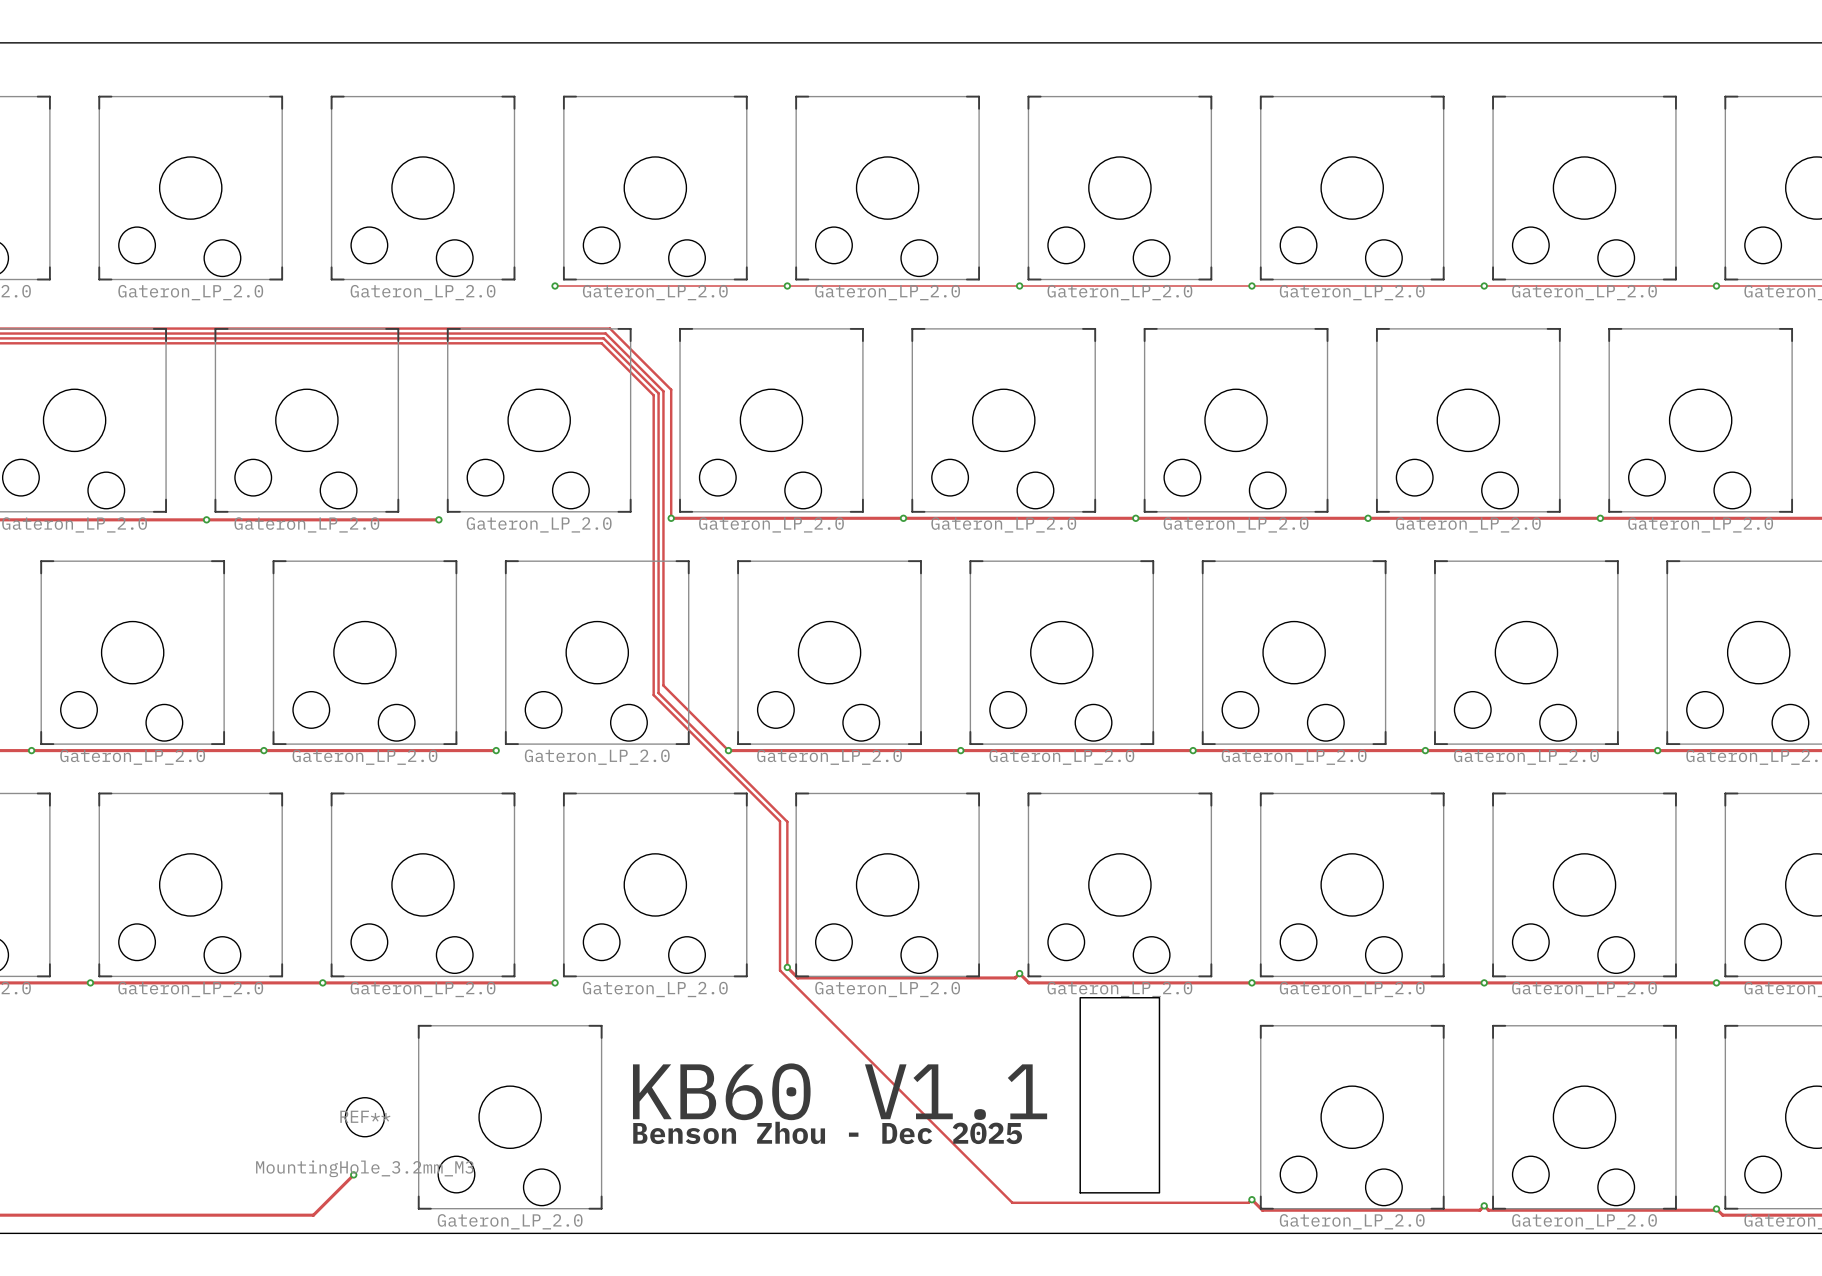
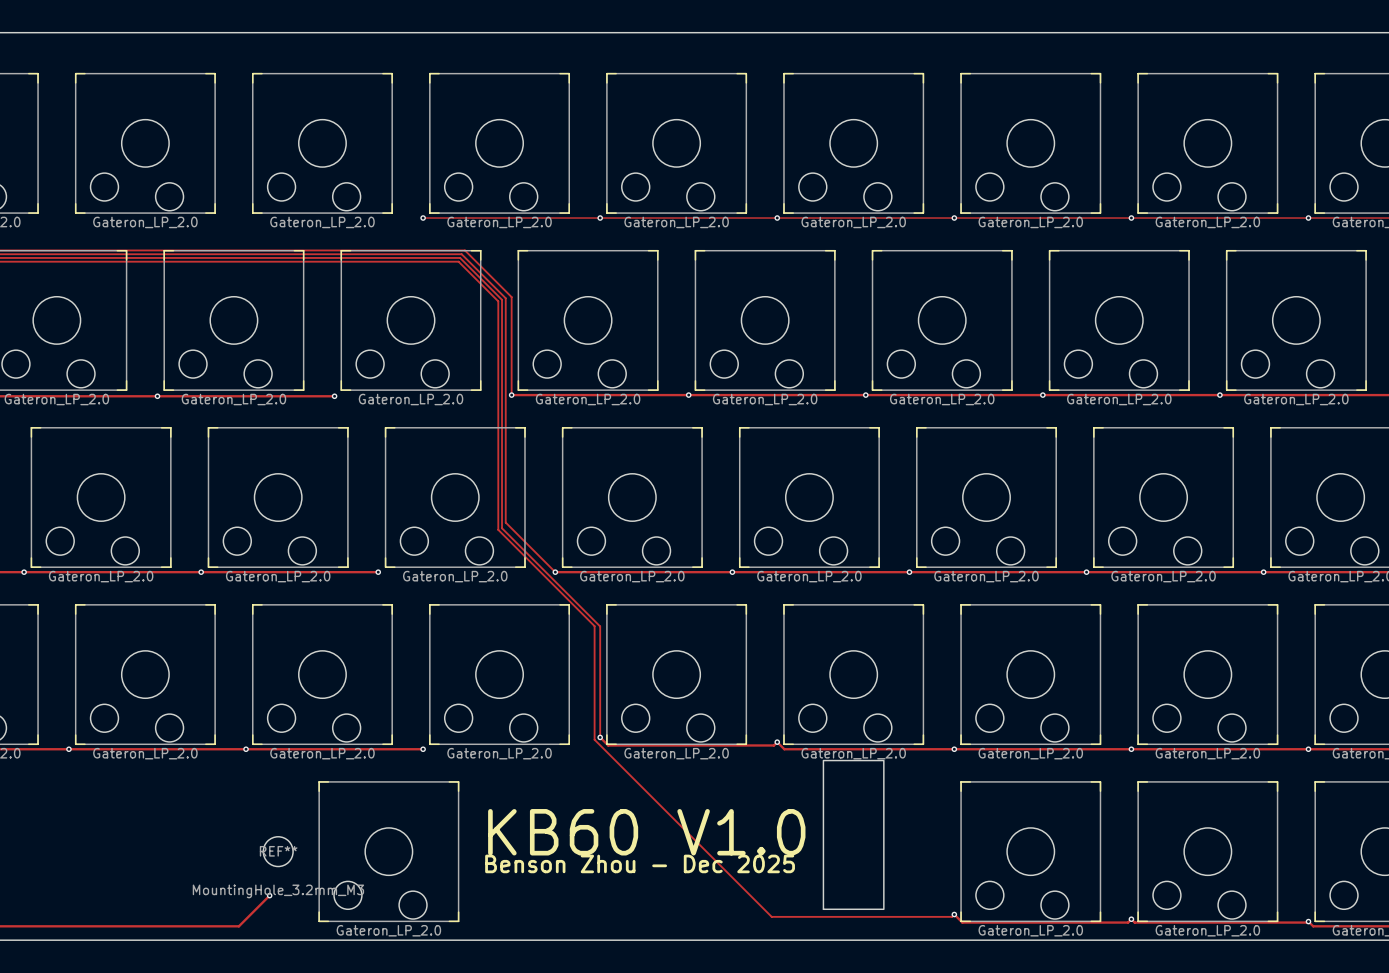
text: KB60 V1.1 (840, 1091) -> KB60 V1.0 (646, 832)

